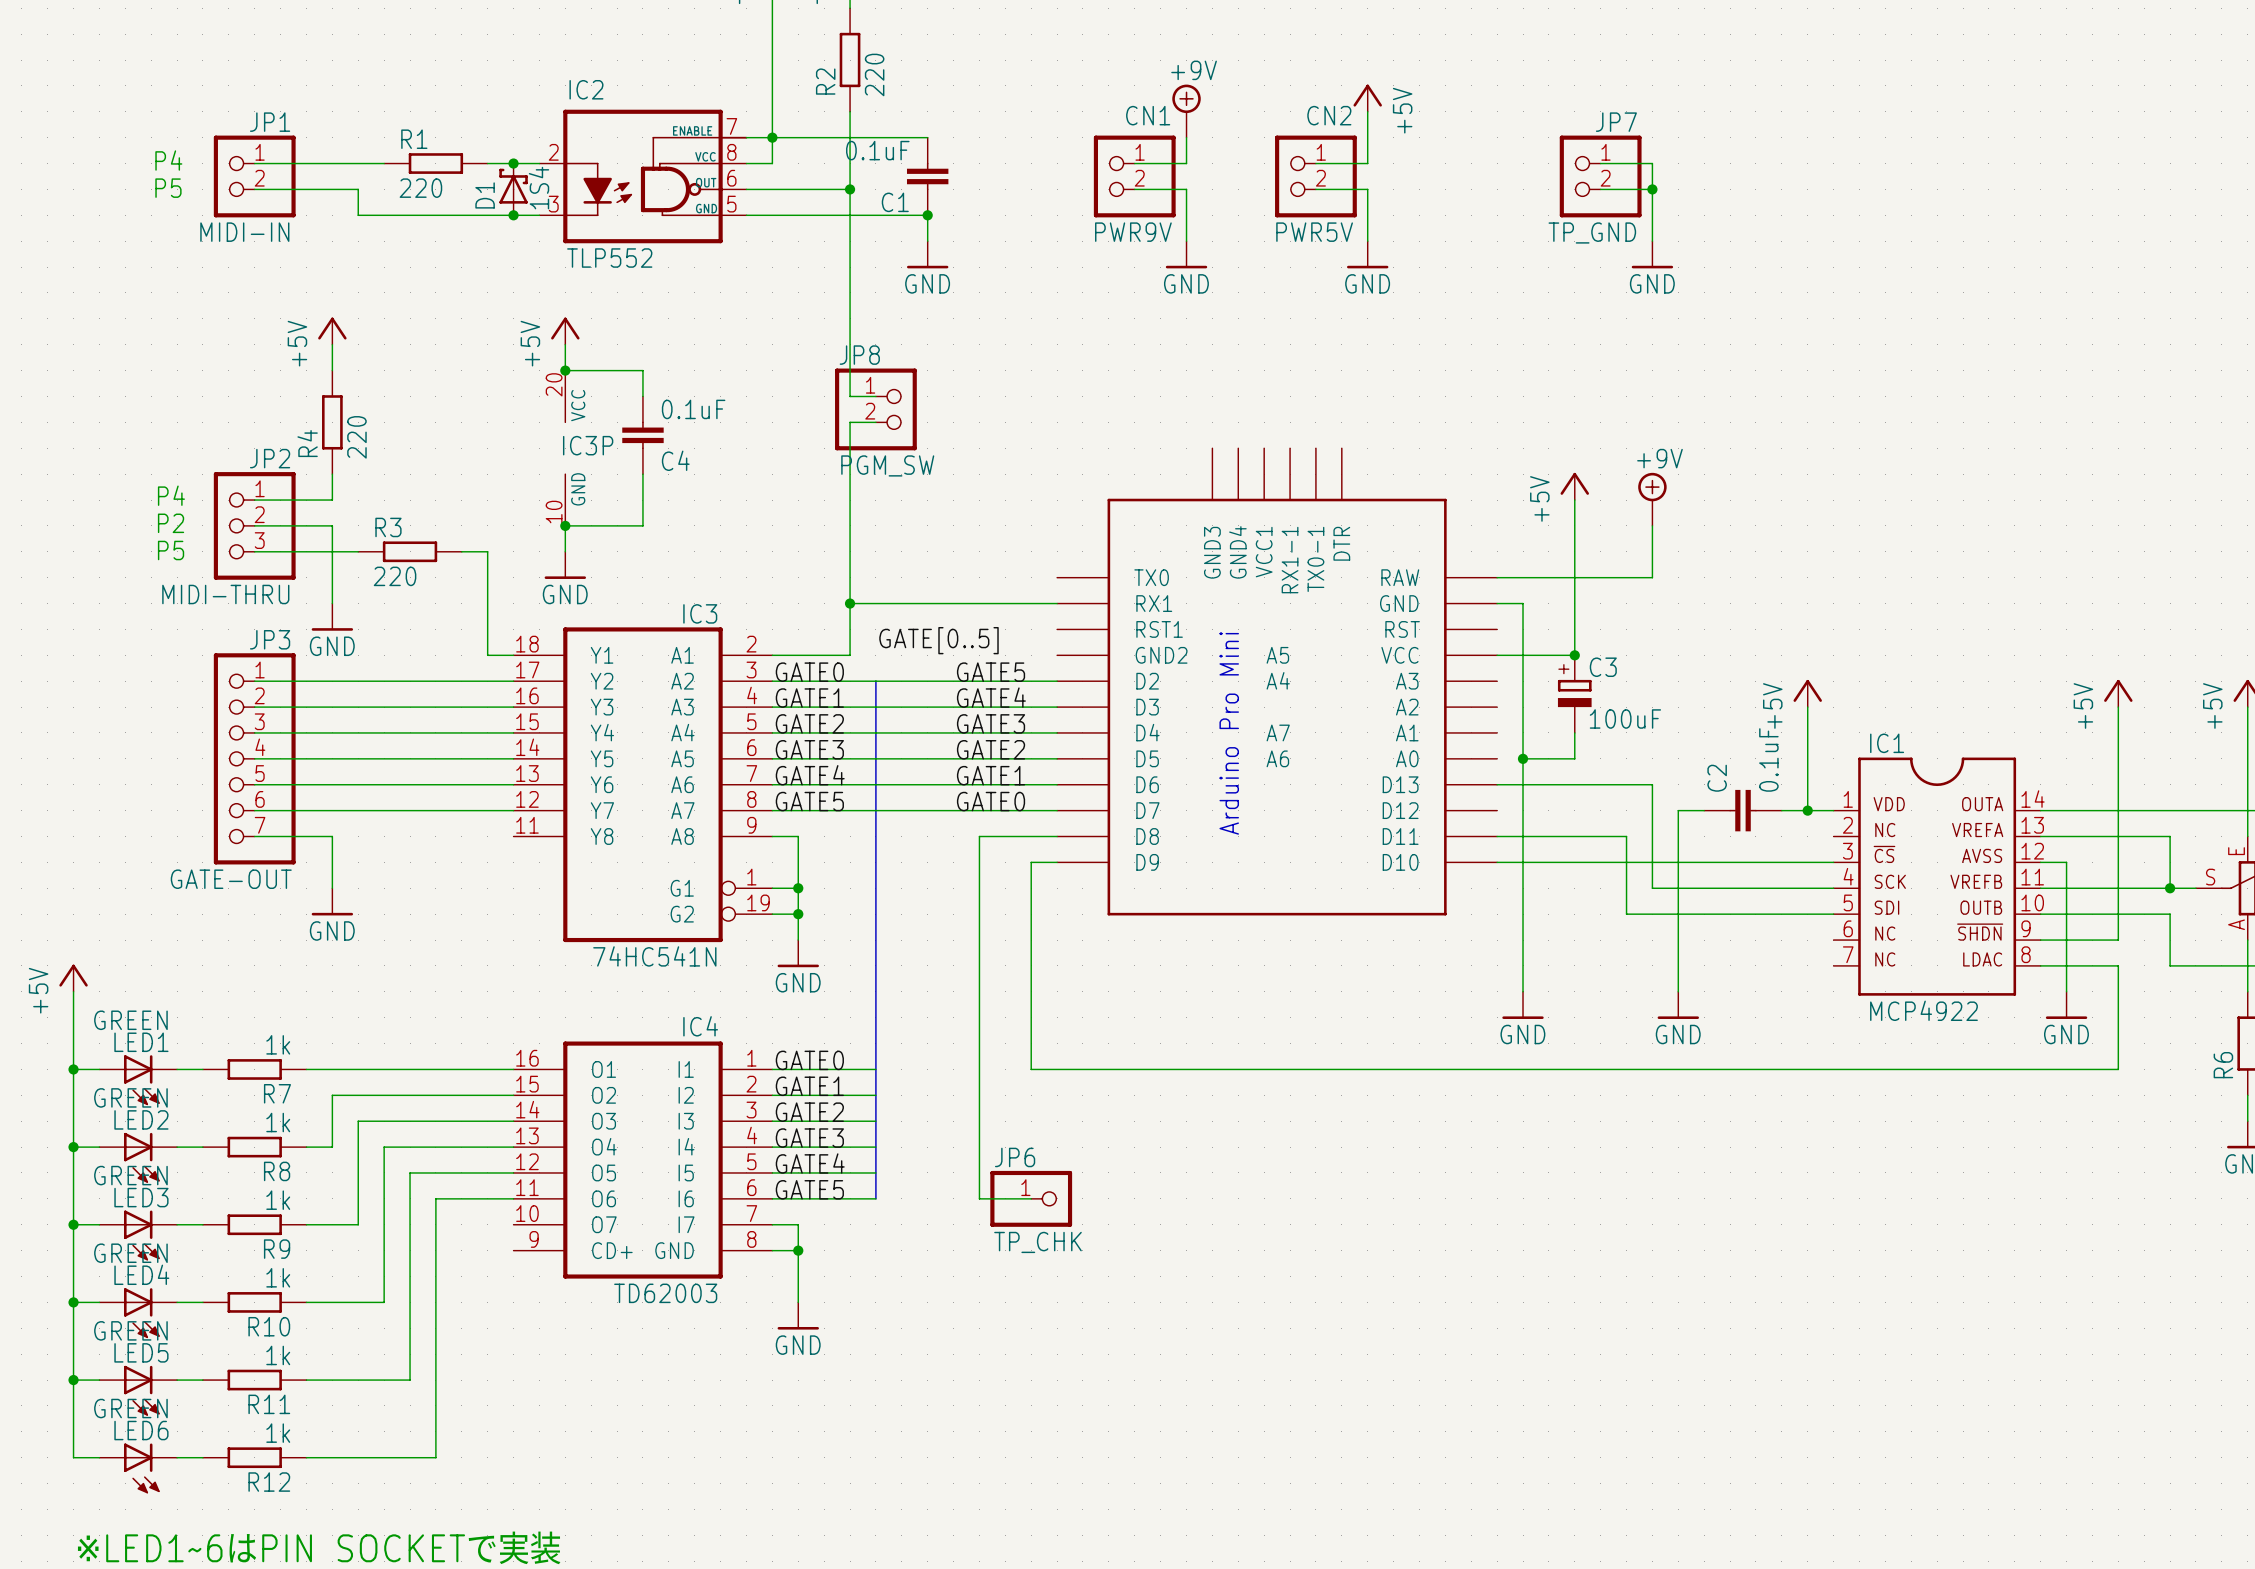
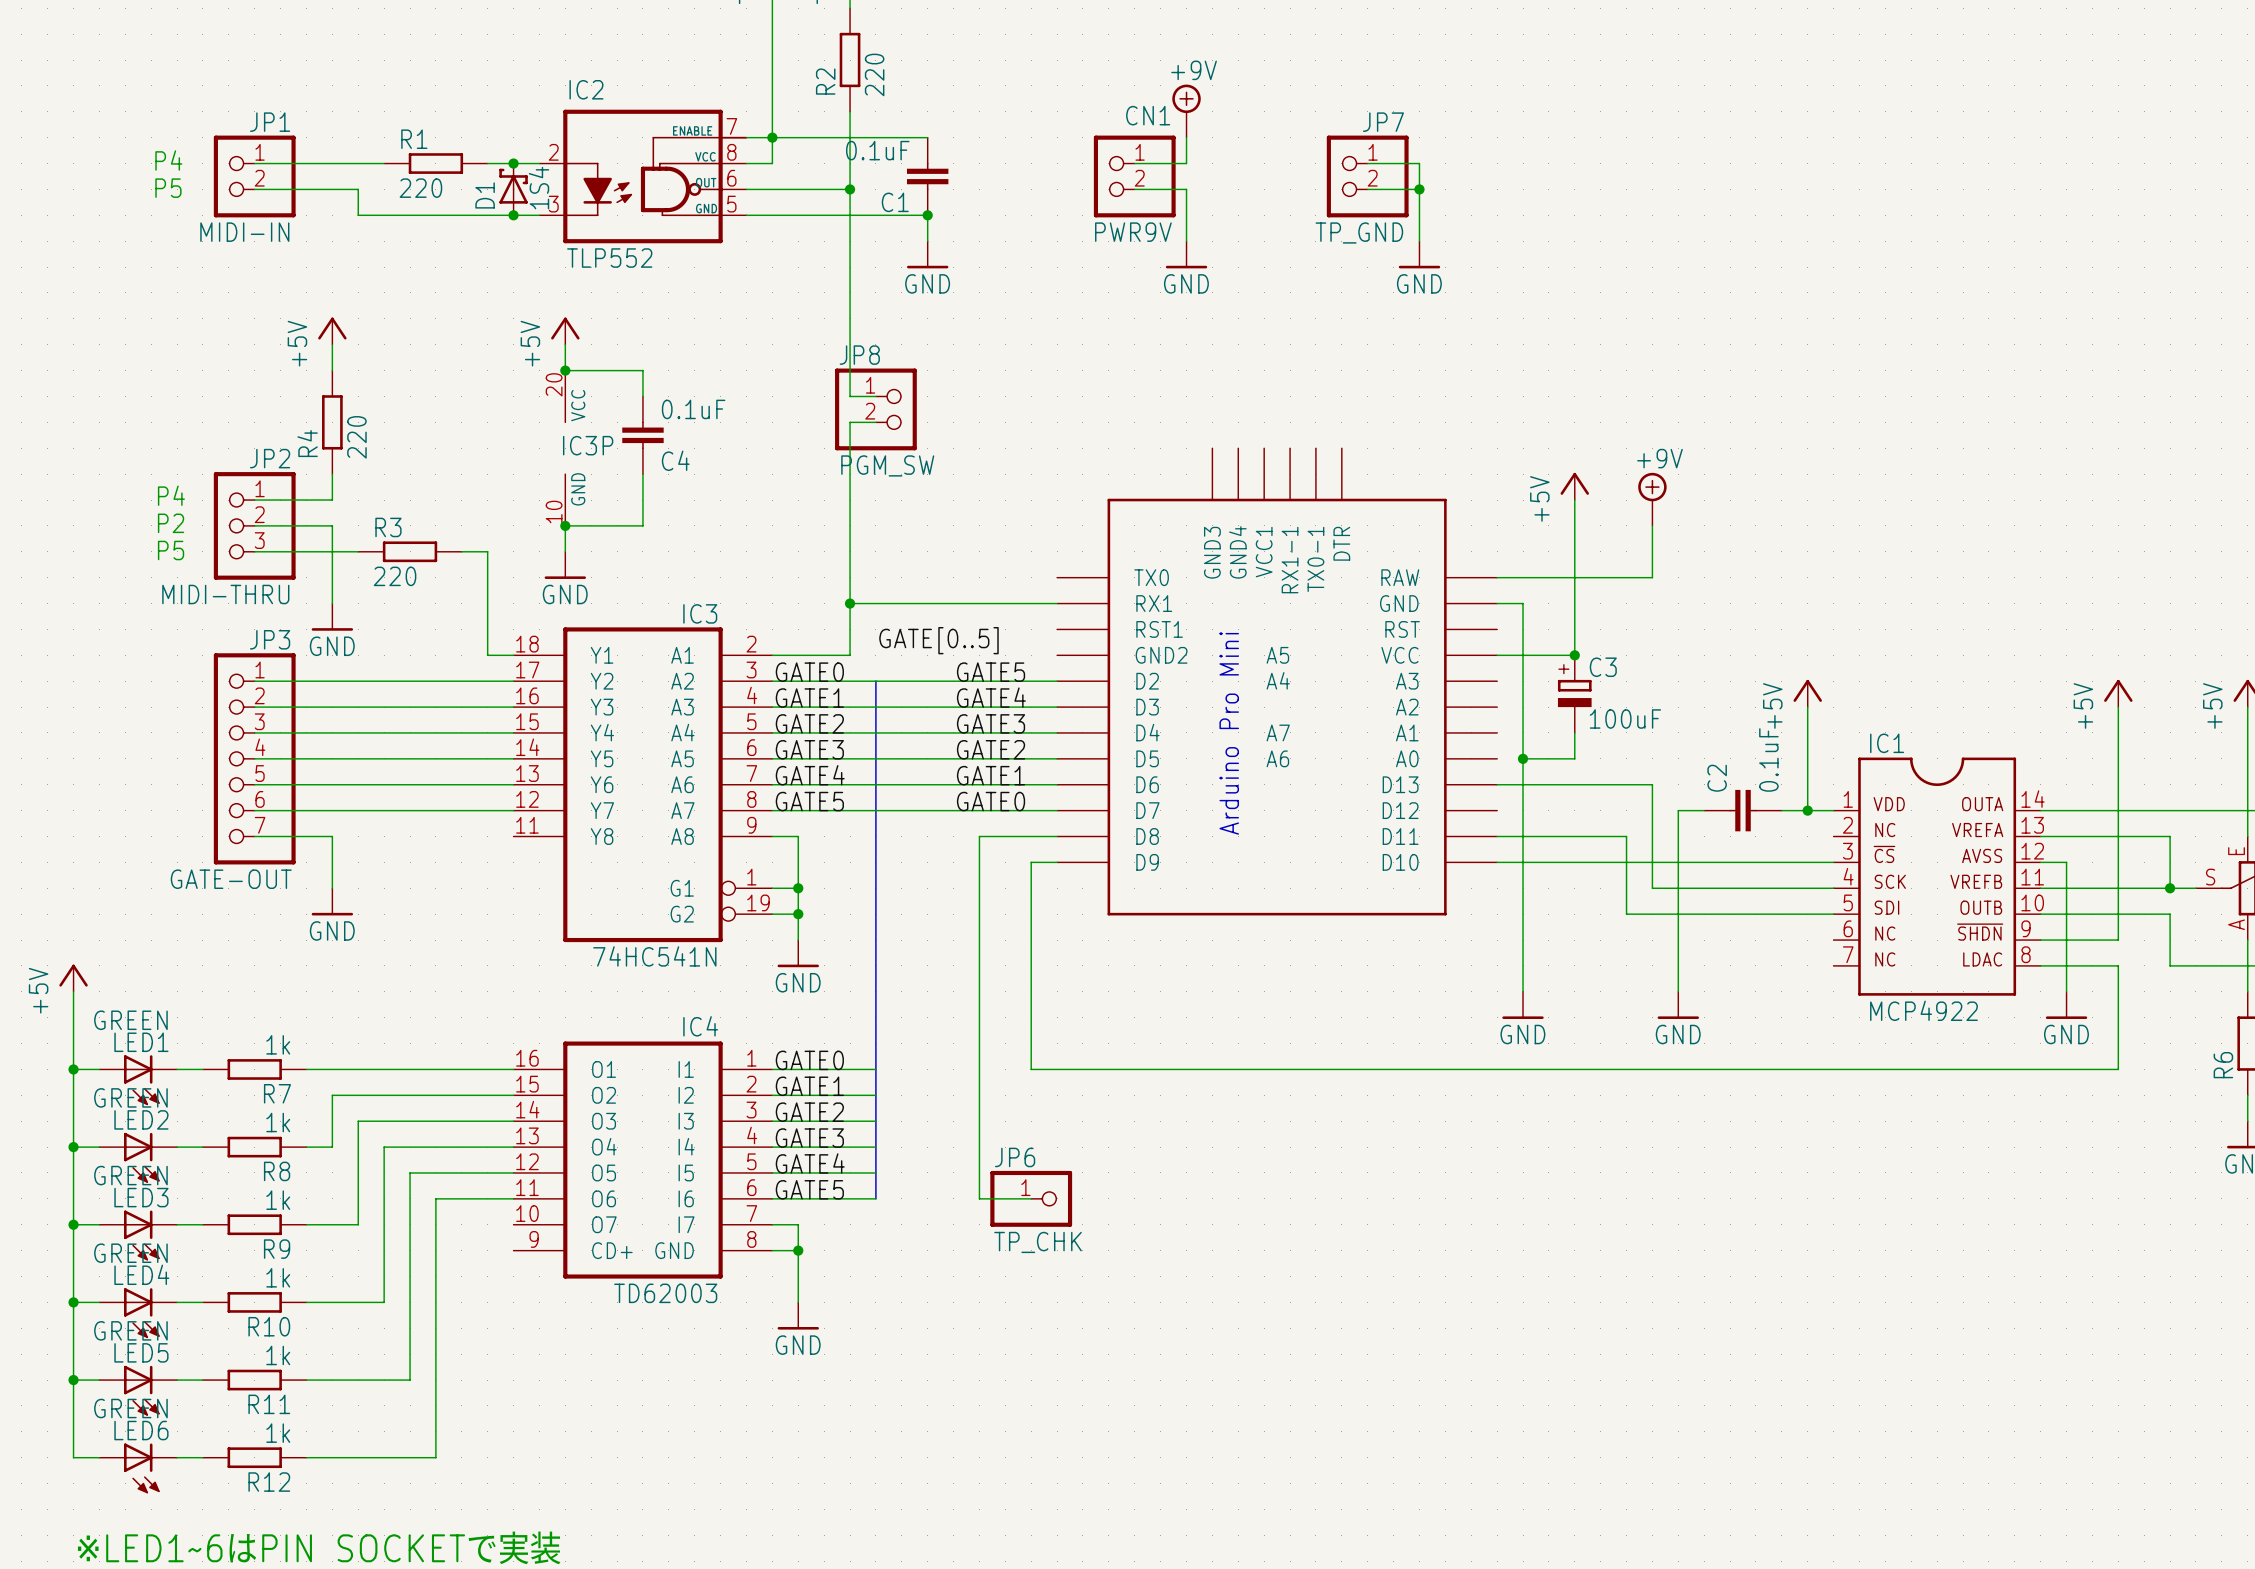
power symbol: +5V (1367, 98) -> none
wire: (1367, 111) (1367, 163) (1315, 163) -> none
wire: (1600, 163) (1652, 163) (1652, 241) -> (1367, 163) (1419, 163) (1419, 241)
CN2: PWR5V (1315, 176) -> none
JP7 position: (1600, 176) -> (1367, 176)
wire: (1315, 189) (1367, 189) (1367, 241) -> none
junction: none -> (1419, 189)
wire: (1600, 189) (1652, 189) -> (1367, 189) (1419, 189)
junction: (1652, 189) -> none
power symbol position: GND (1367, 254) -> GND (1419, 254)
power symbol: GND (1652, 254) -> none

